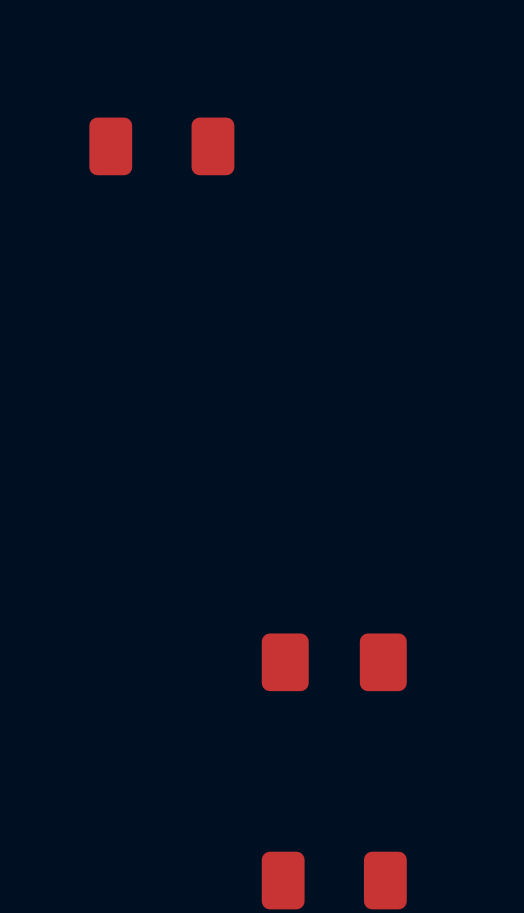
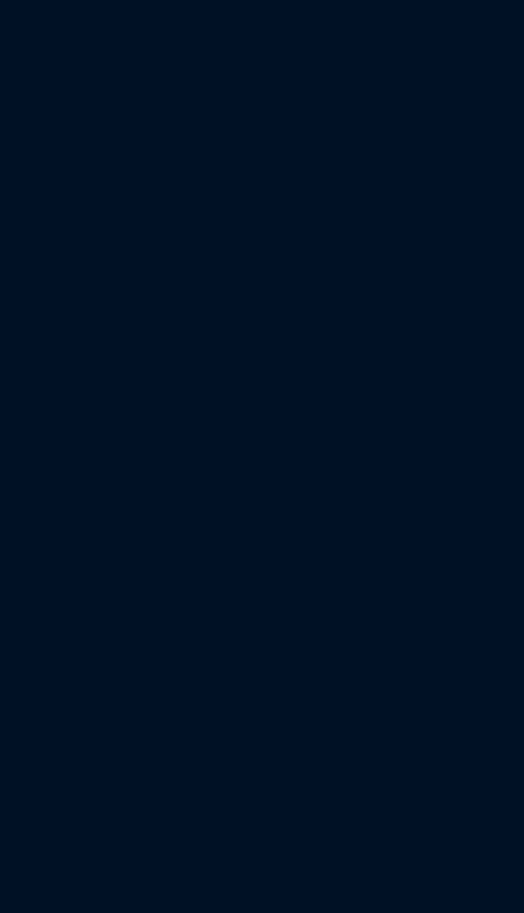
part: (161, 146) -> none
part: (334, 662) -> none
part: (334, 880) -> none

